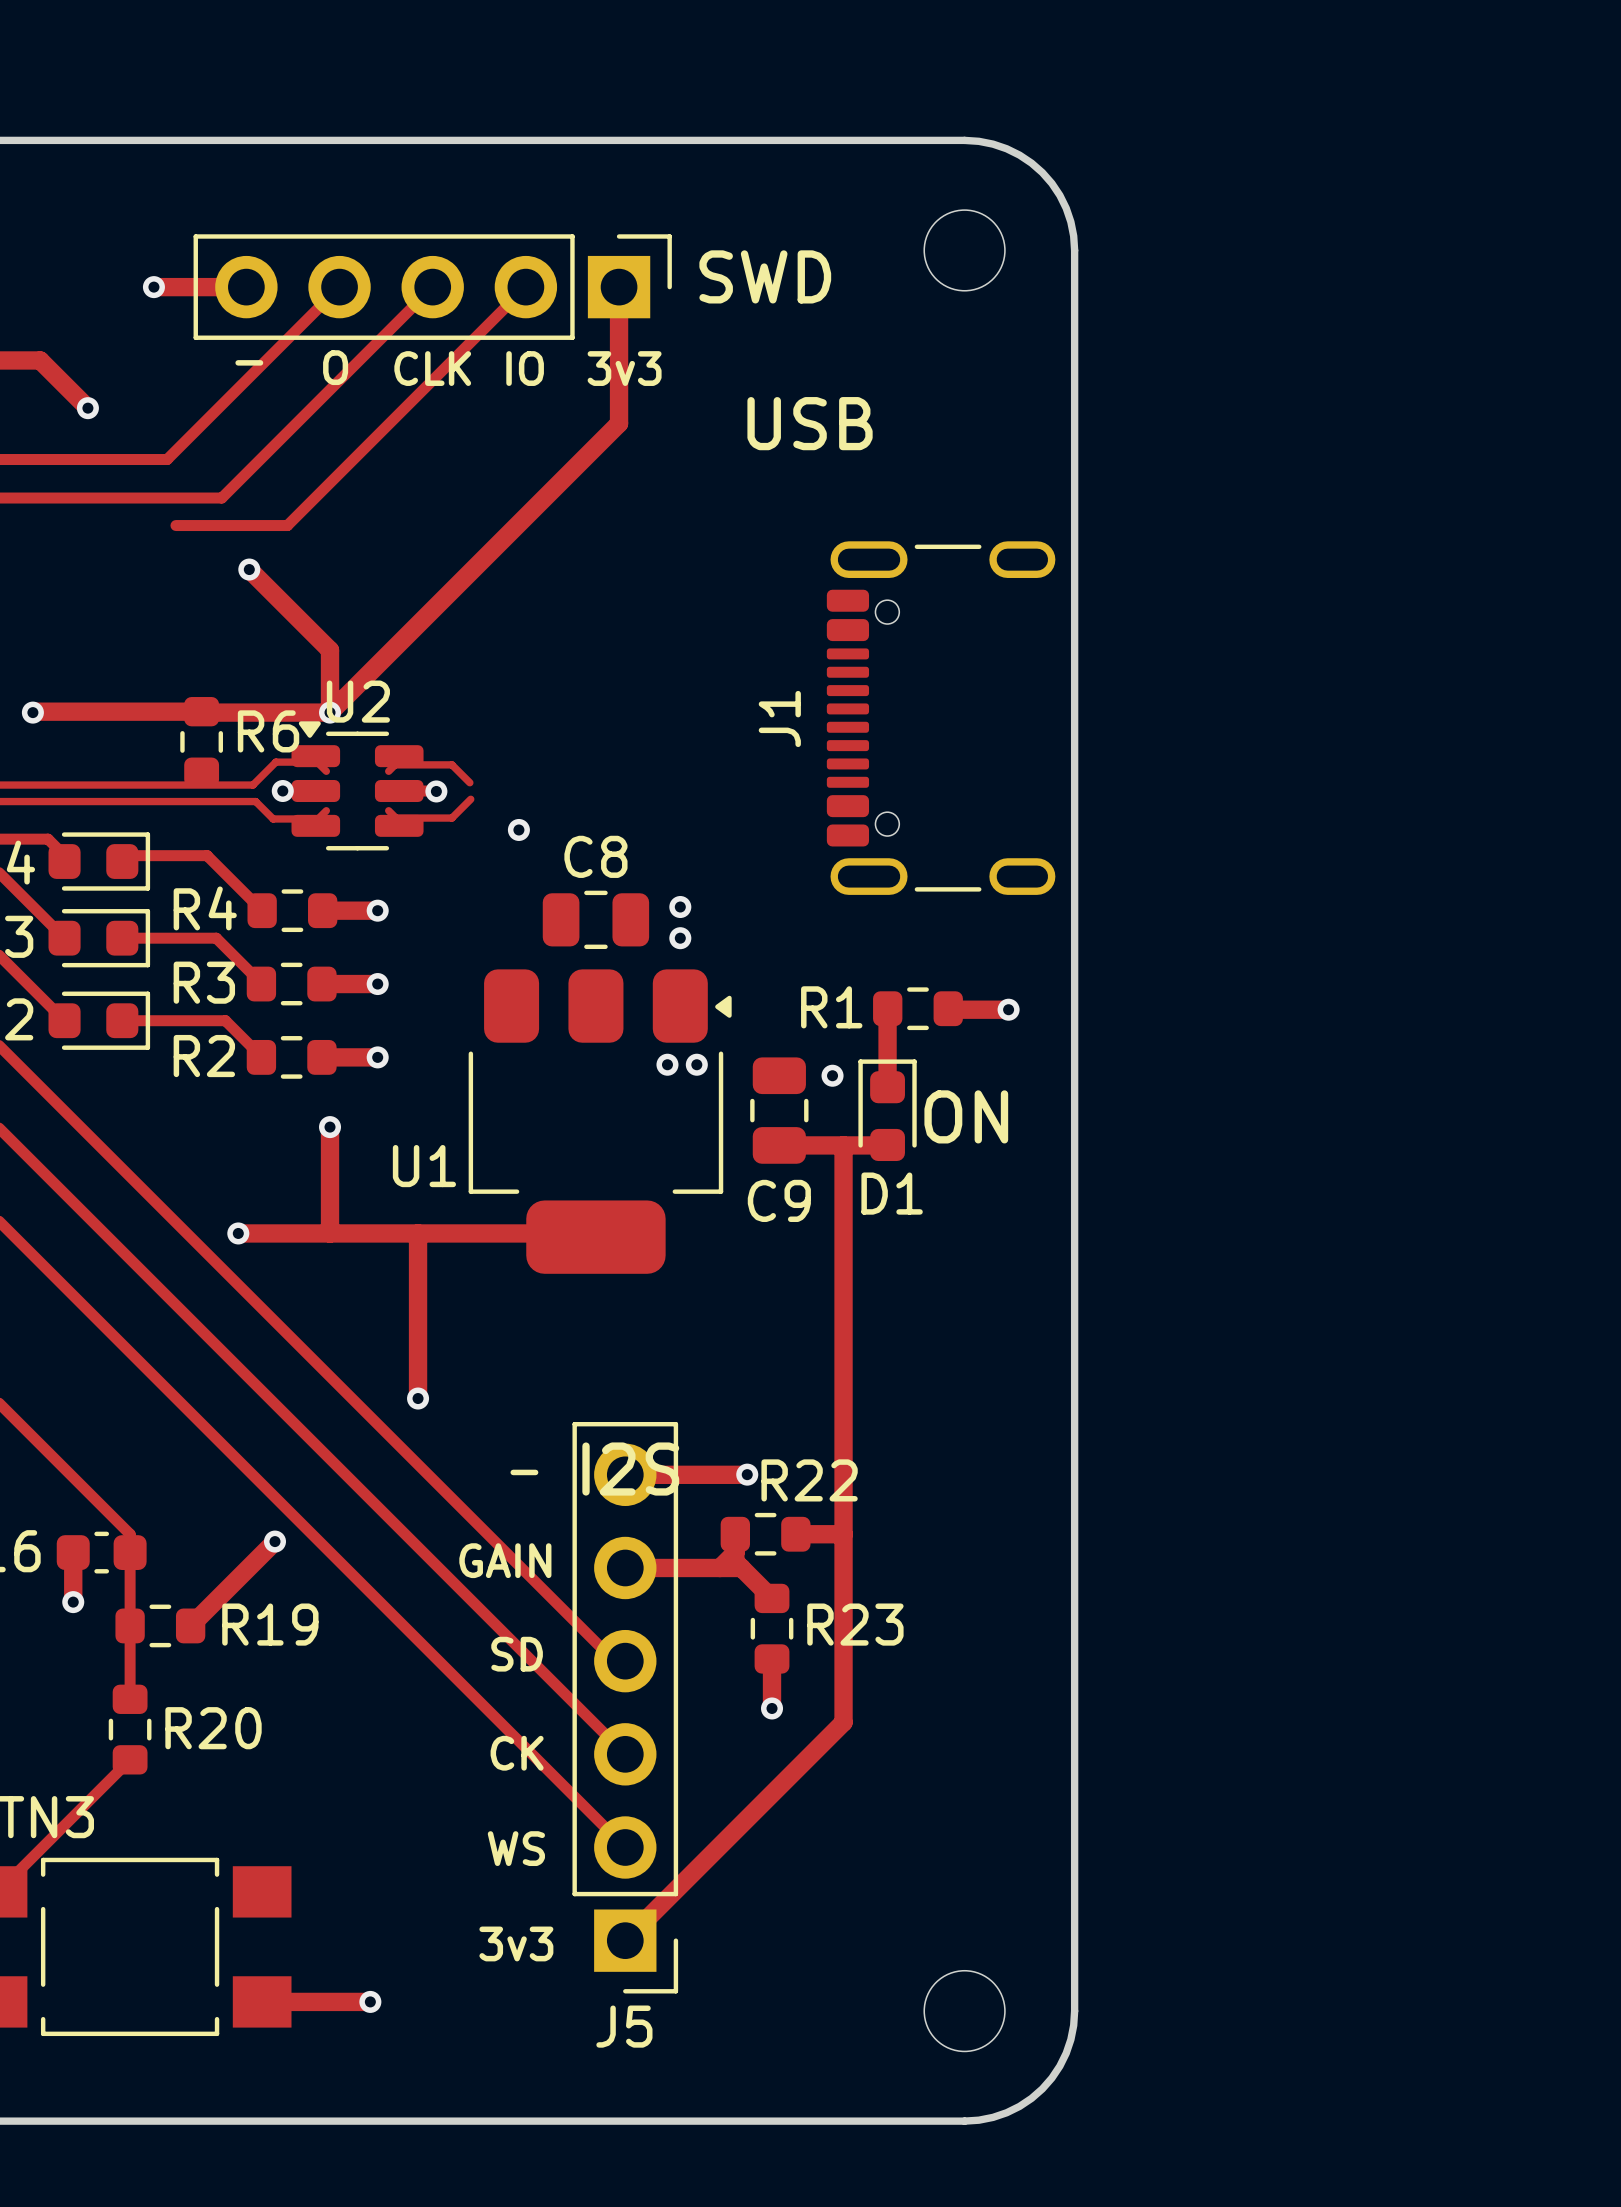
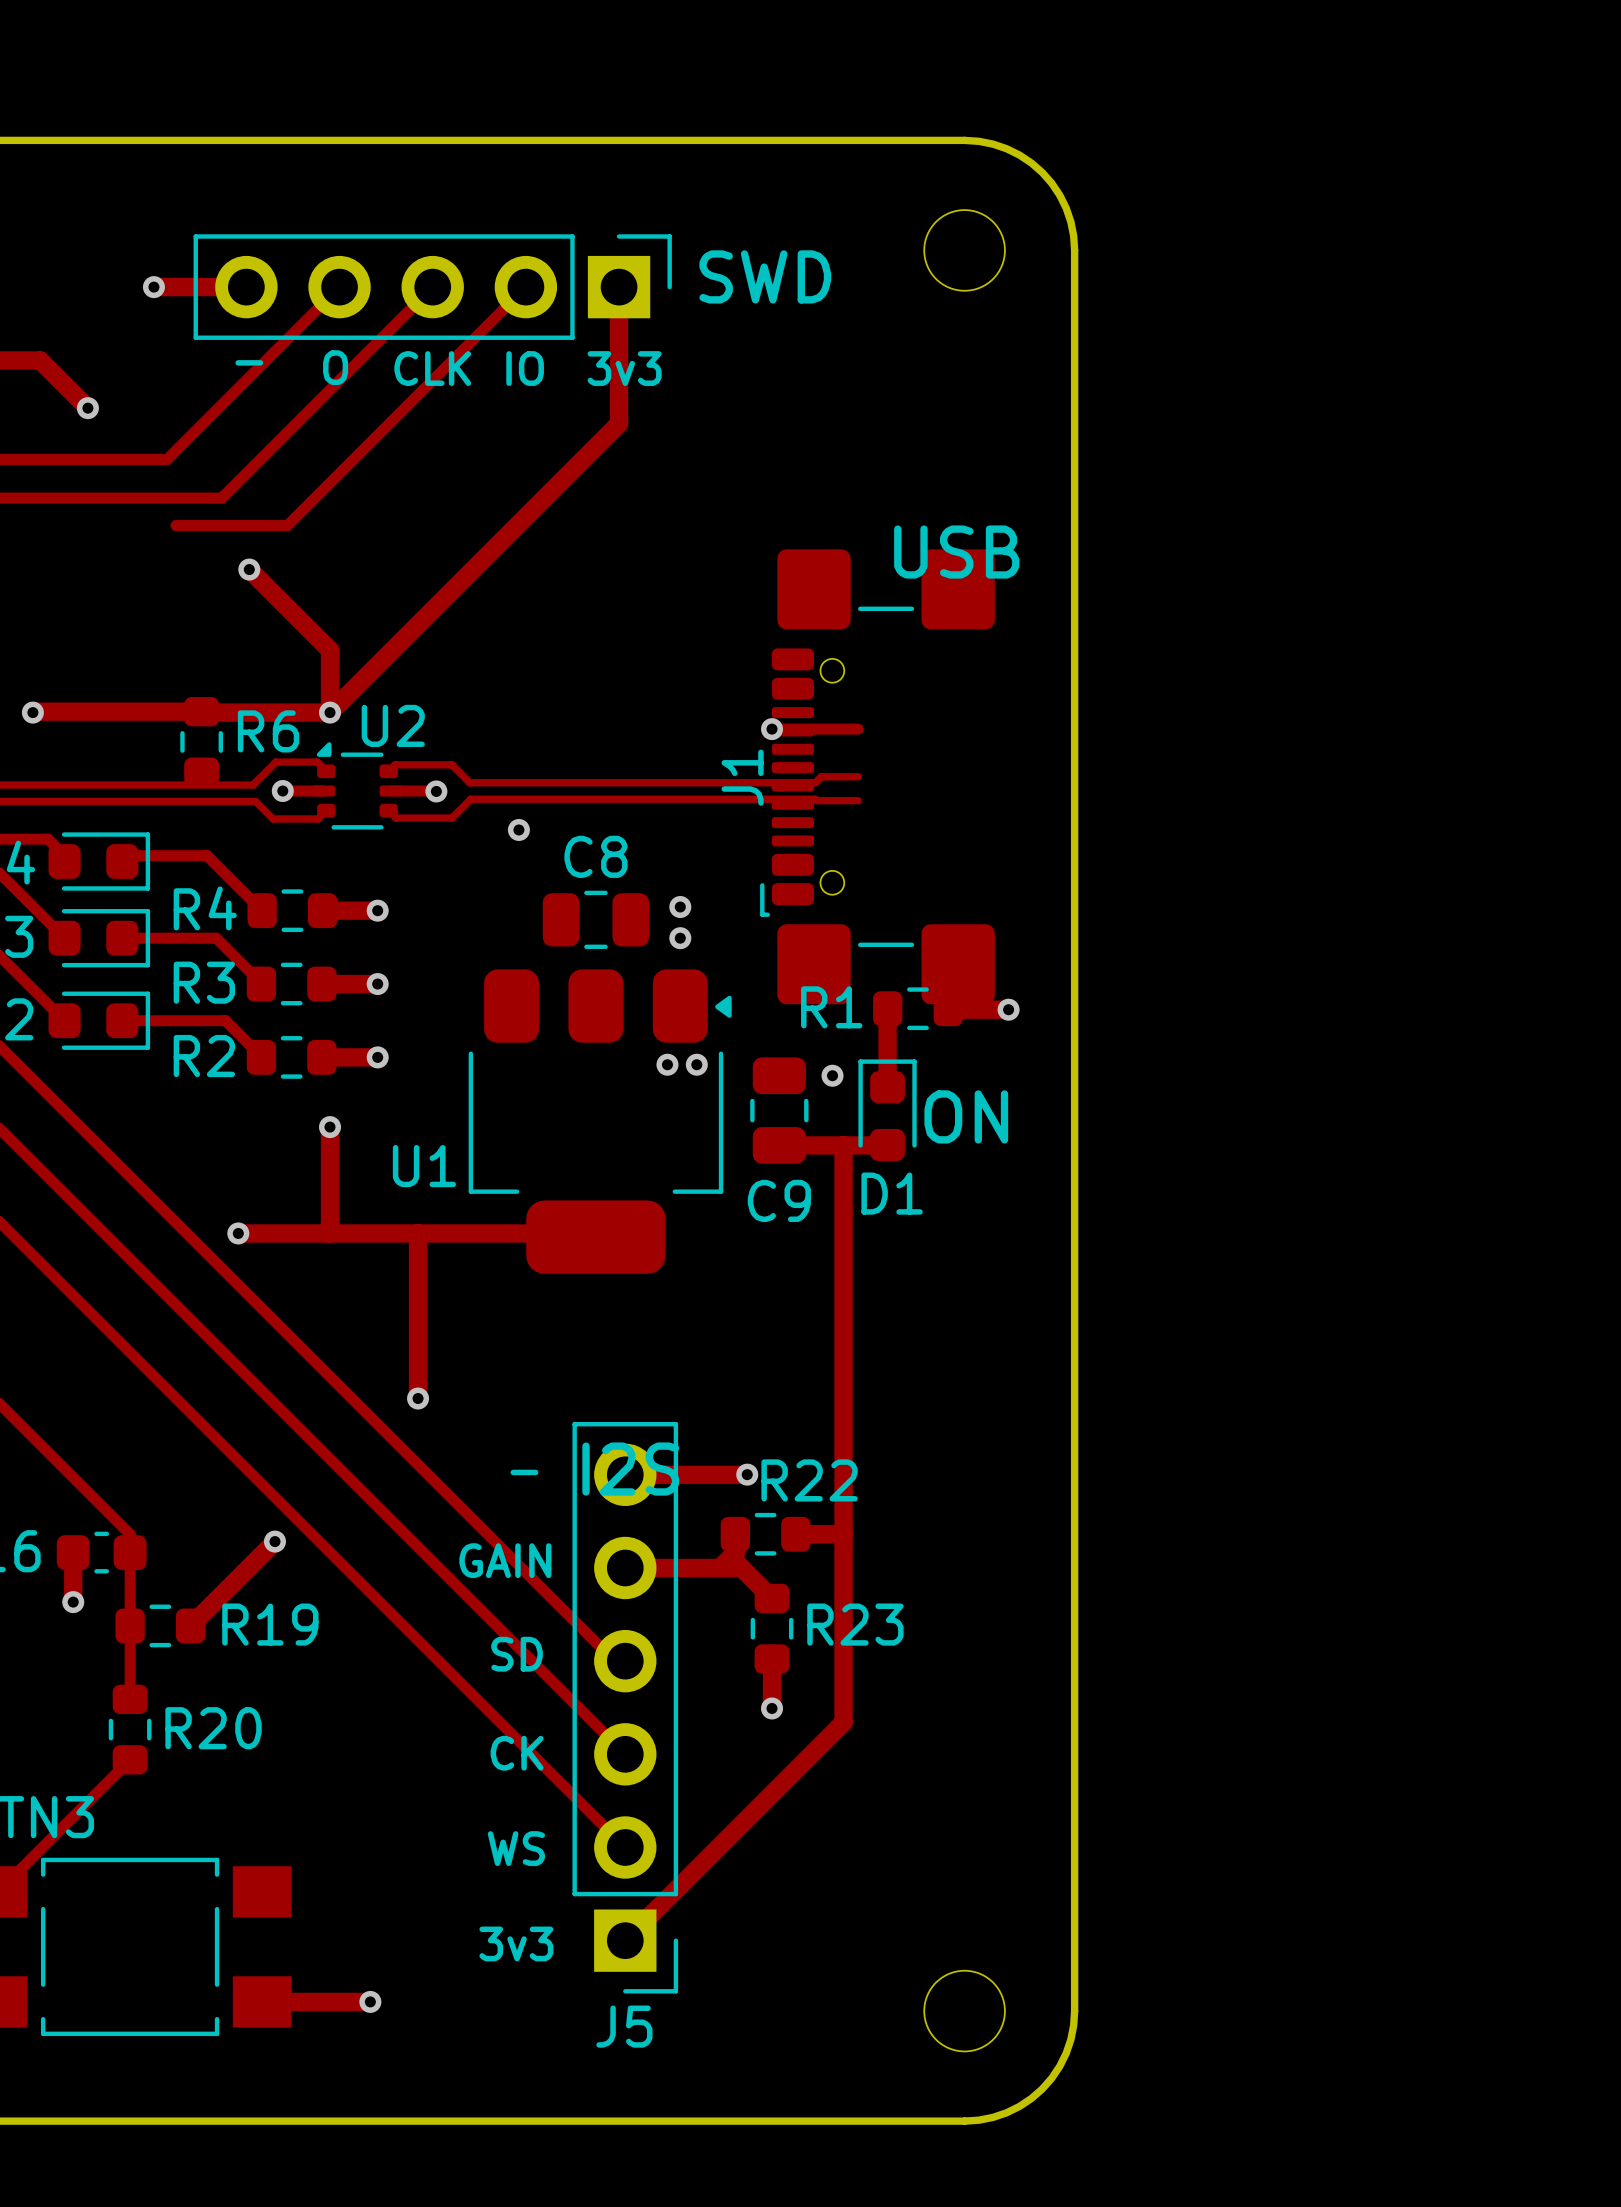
text position: USB (810, 423) -> USB (956, 552)
J1 footprint: [826, 541, 1056, 895] -> [760, 549, 995, 1005]
U2 name position: U2 (358, 701) -> U2 (393, 725)
U2 footprint: [291, 721, 424, 851] -> [311, 742, 404, 830]
track: none -> (772, 729) (858, 729)
via: none -> (772, 729)
track: none -> (858, 776) (821, 776) (815, 782) (469, 782)
track: none -> (470, 799) (858, 800)

